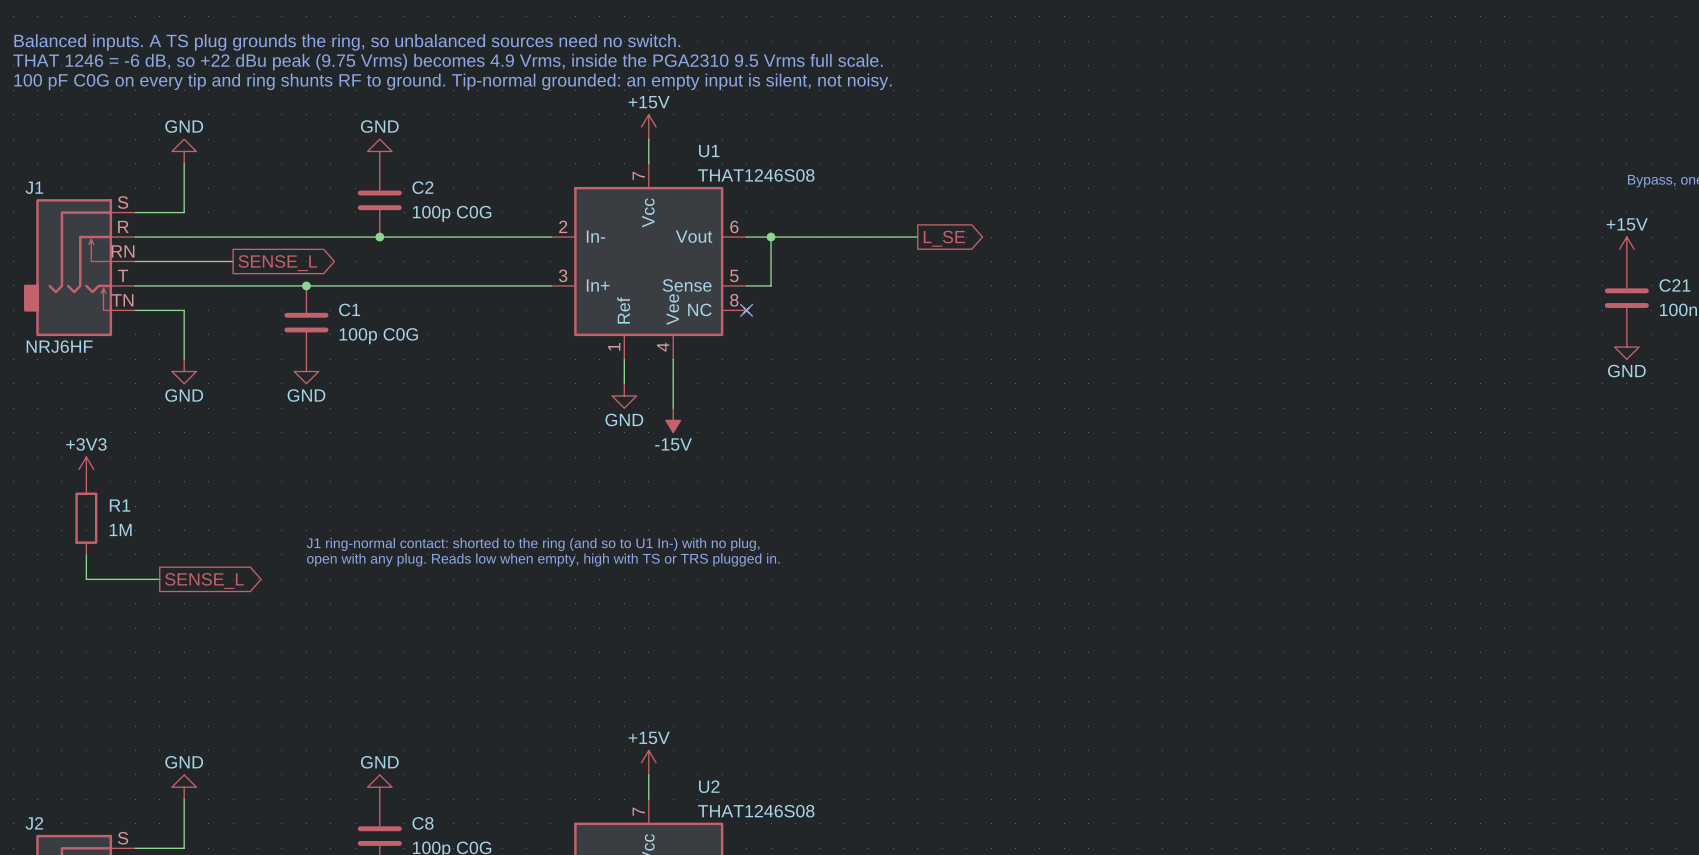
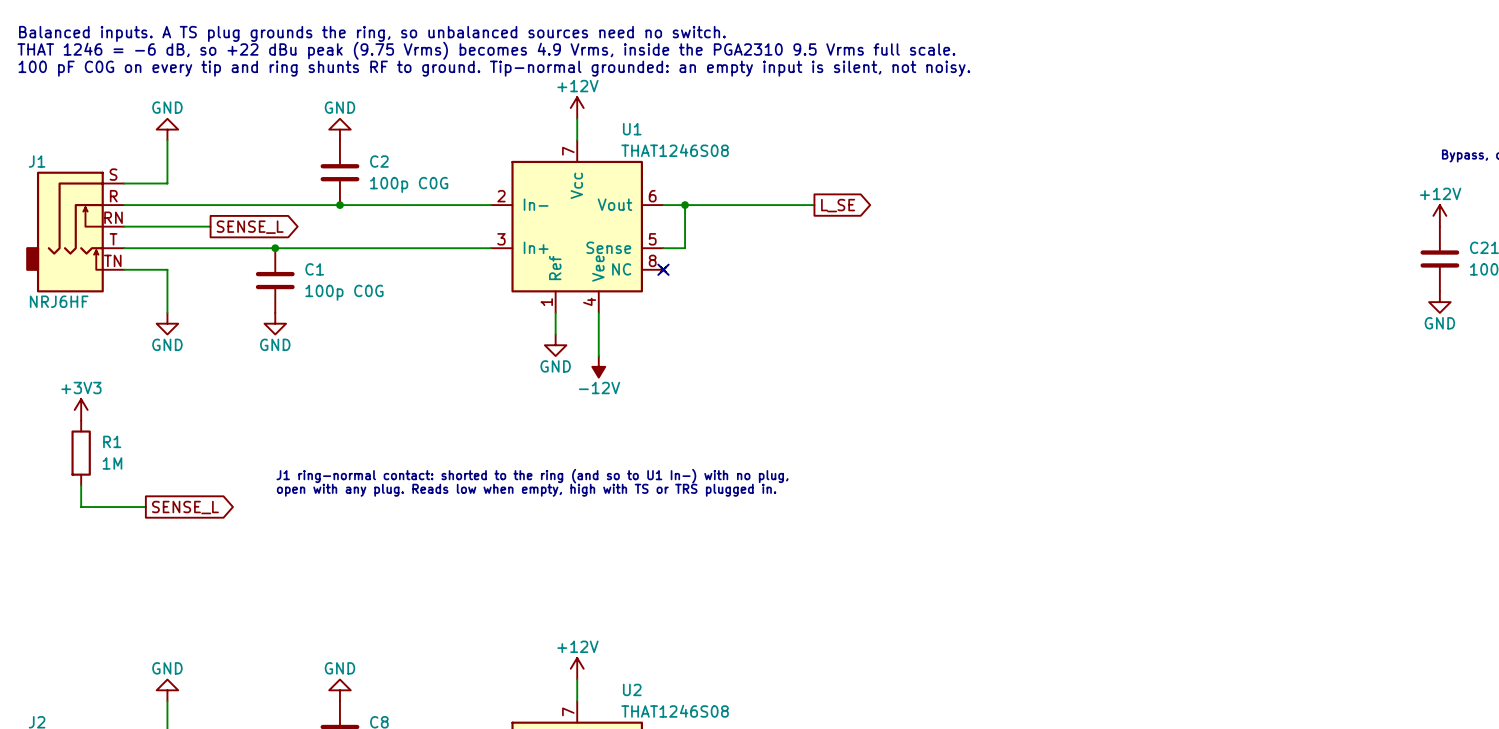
power symbol: +15V (648, 127) -> +12V (577, 108)
power symbol: +15V (1626, 249) -> +12V (1439, 215)
power symbol: -15V (673, 420) -> -12V (598, 366)
power symbol: +15V (648, 762) -> +12V (577, 668)

